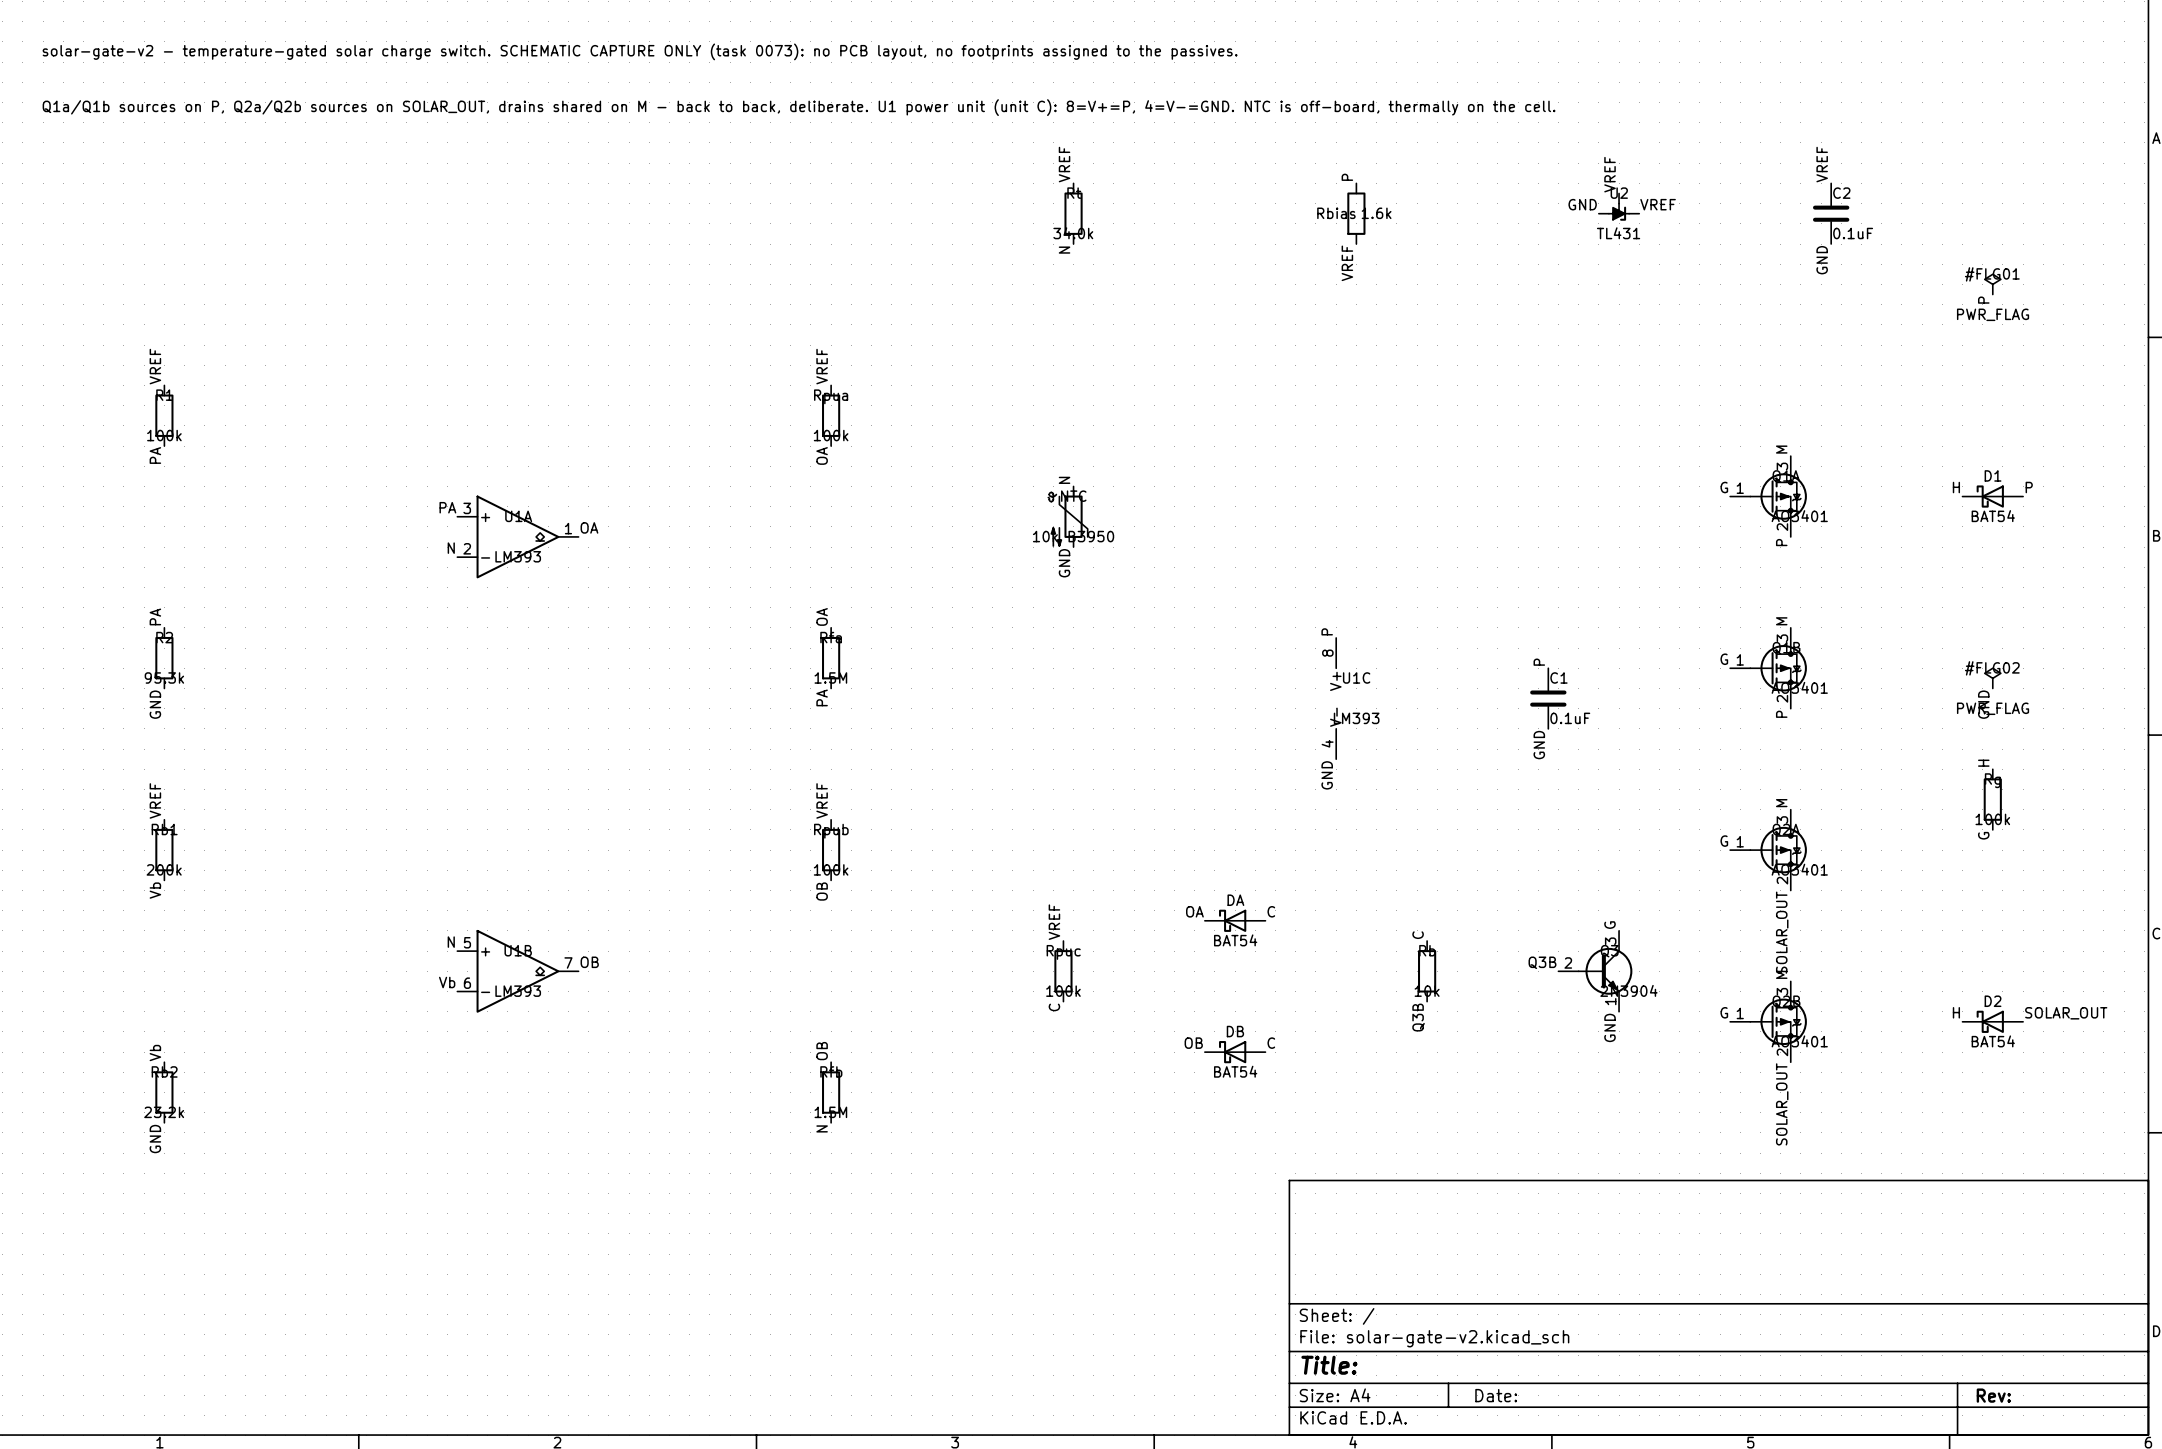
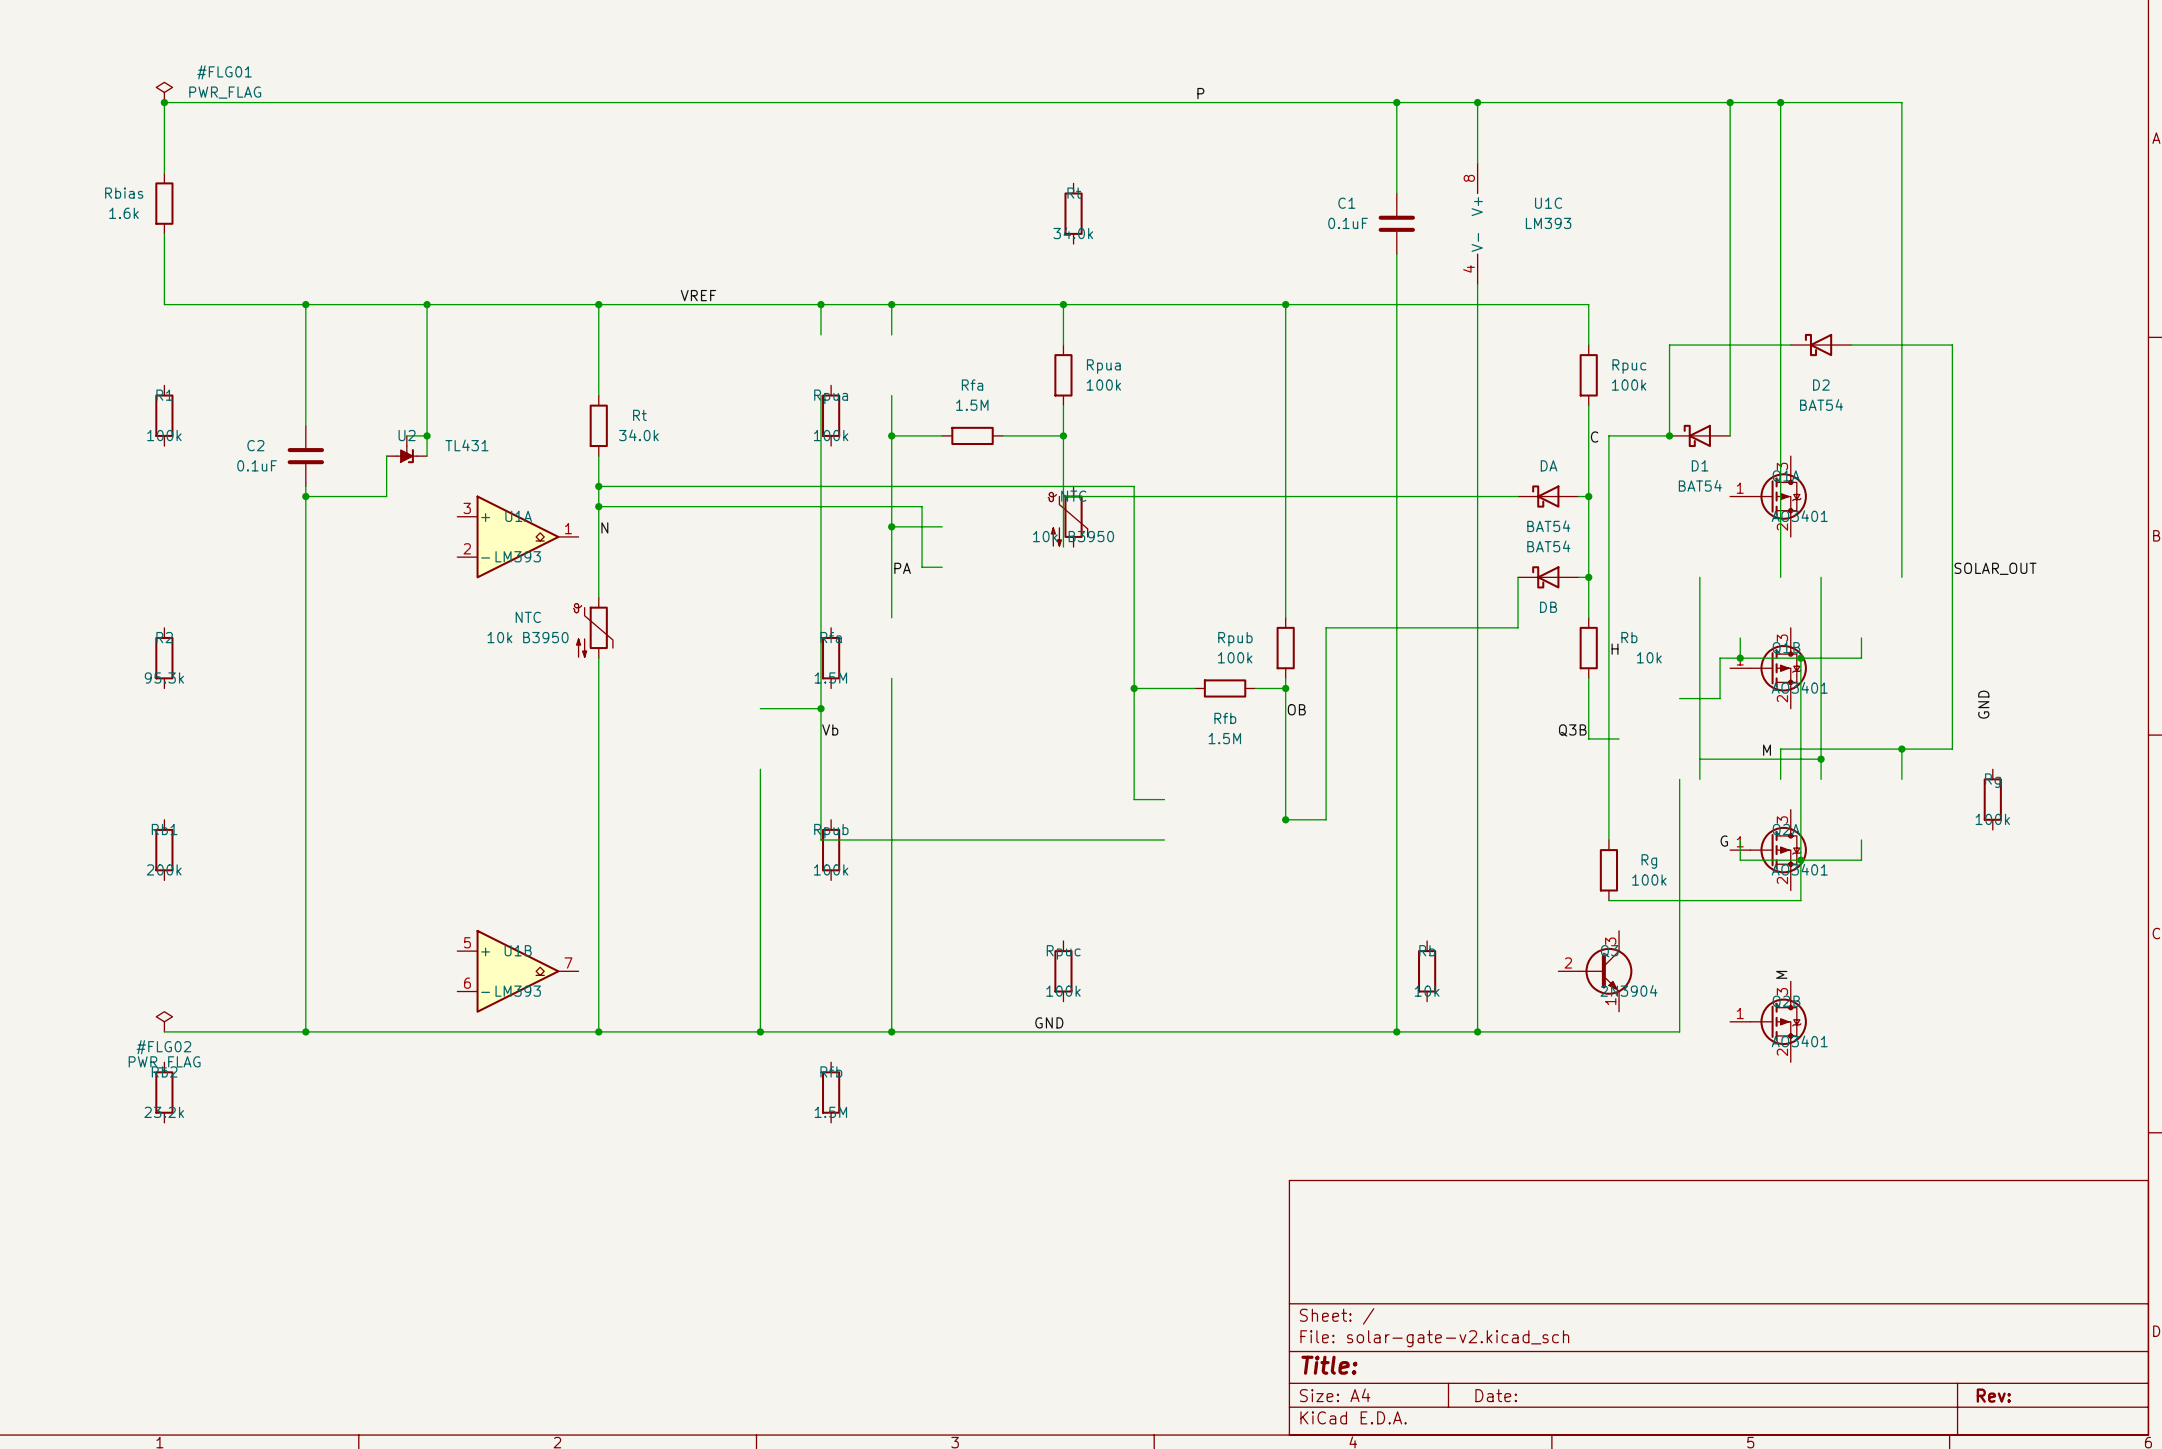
text: solar-gate-v2 - temperature-gated solar charge switch. SCHEMATIC CAPTURE ONLY (task 0073): no PCB layout, no footprints assigned to the passives. (640, 51) -> none
junction: none -> (164, 102)
wire: none -> (1396, 102) (1396, 193)
junction: none -> (1396, 102)
wire: none -> (1477, 102) (1477, 163)
junction: none -> (1477, 102)
wire: none -> (1730, 102) (1730, 435)
junction: none -> (1730, 102)
wire: none -> (1780, 102) (1780, 577)
junction: none -> (1780, 102)
text: Q1a/Q1b sources on P, Q2a/Q2b sources on SOLAR_OUT, drains shared on M - back to back, deliberate. U1 power unit (unit C): 8=V+=P, 4=V-=GND. NTC is off-board, thermally on the cell. (799, 107) -> none
label: VREF (1064, 164) -> none
label: VREF (1822, 164) -> none
wire: none -> (164, 173) (164, 102) (1901, 102) (1901, 577)
label: VREF (1610, 174) -> none
label rotation: 0° (1347, 177) -> 90° clockwise (1200, 93)
label position: P (1347, 177) -> P (1200, 93)
C2 name position: C2 (1841, 193) -> C2 (255, 445)
Rbias: none -> 1.6k (164, 203)
label: GND (1582, 204) -> none
label: VREF (1658, 204) -> none
U2 position: (1619, 207) -> (406, 449)
Rbias: 1.6k (1356, 213) -> none
C2 position: (1831, 213) -> (305, 456)
wire: none -> (164, 233) (164, 304) (1588, 304) (1588, 345)
U2 value position: TL431 (1618, 233) -> TL431 (466, 445)
C2 value position: 0.1uF (1853, 233) -> 0.1uF (257, 465)
label: N (1064, 250) -> none
wire: none -> (1396, 254) (1396, 1031)
label: GND (1822, 260) -> none
label: VREF (1347, 263) -> none
#FLG01 name position: #FLG01 (1992, 274) -> #FLG01 (224, 72)
wire: none -> (1477, 284) (1477, 1031)
#FLG01 position: PWR_FLAG (1992, 284) -> PWR_FLAG (164, 92)
label: P (1983, 300) -> none
wire: none -> (305, 304) (305, 425)
junction: none -> (305, 304)
wire: none -> (427, 304) (427, 456)
junction: none -> (427, 304)
wire: none -> (598, 304) (598, 395)
junction: none -> (598, 304)
wire: none -> (821, 304) (821, 334)
junction: none -> (821, 304)
wire: none -> (891, 304) (891, 334)
junction: none -> (891, 304)
wire: none -> (1063, 304) (1063, 345)
junction: none -> (1063, 304)
wire: none -> (1285, 304) (1285, 617)
junction: none -> (1285, 304)
#FLG01 text position: PWR_FLAG (1993, 314) -> PWR_FLAG (225, 92)
wire: none -> (1790, 345) (1669, 345) (1669, 435) (1608, 435) (1608, 839)
wire: none -> (1851, 345) (1952, 345) (1952, 749) (1780, 749) (1780, 779)
label: VREF (155, 366) -> none
label rotation: 0° (822, 366) -> 90° clockwise (698, 295)
label position: VREF (822, 366) -> VREF (698, 295)
Rpua: none -> 100k (1063, 375)
Rpuc: none -> 100k (1588, 375)
wire: none -> (821, 395) (821, 839) (1164, 839)
wire: none -> (891, 395) (891, 617)
wire: none -> (1063, 405) (1063, 547)
wire: none -> (1588, 405) (1588, 617)
Rt: none -> 34.0k (598, 425)
wire: none -> (406, 435) (427, 435)
junction: none -> (427, 435)
wire: none -> (891, 435) (942, 435)
junction: none -> (891, 435)
Rfa: none -> 1.5M (972, 435)
wire: none -> (1002, 435) (1063, 435)
junction: none -> (1063, 435)
junction: none -> (1669, 435)
label: none -> C (1594, 437)
label: M (1781, 449) -> none
label: PA (155, 455) -> none
label: OA (822, 455) -> none
wire: none -> (386, 456) (386, 496) (305, 496)
wire: none -> (598, 456) (598, 597)
D1 name position: D1 (1993, 475) -> D1 (1700, 465)
label: N (1064, 480) -> none
wire: none -> (305, 486) (305, 1031)
wire: none -> (598, 486) (1134, 486) (1134, 799) (1164, 799)
junction: none -> (598, 486)
label: G (1724, 487) -> none
label: H (1956, 487) -> none
label: P (2029, 487) -> none
junction: none -> (305, 496)
wire: none -> (1063, 496) (1518, 496)
DA: none -> BAT54 (1548, 496)
wire: none -> (1578, 496) (1588, 496)
junction: none -> (1588, 496)
D1 position: (1992, 496) -> (1699, 435)
wire: none -> (598, 506) (922, 506) (922, 567) (942, 567)
junction: none -> (598, 506)
label: PA (447, 507) -> none
D1 value position: BAT54 (1993, 516) -> BAT54 (1700, 485)
wire: none -> (891, 526) (942, 526)
junction: none -> (891, 526)
label: OA (589, 527) -> none
label: P (1781, 542) -> none
label position: N (451, 548) -> N (604, 527)
label: GND (1064, 563) -> none
label: none -> SOLAR_OUT (1995, 568)
wire: none -> (1518, 577) (1518, 627) (1326, 627) (1326, 819) (1285, 819) (1285, 678)
DB: none -> BAT54 (1548, 577)
wire: none -> (1578, 577) (1588, 577)
junction: none -> (1588, 577)
wire: none -> (1699, 577) (1699, 779)
wire: none -> (1821, 577) (1821, 779)
label: PA (155, 616) -> none
label: OA (822, 616) -> none
label: M (1781, 621) -> none
NTC: none -> 10k B3950 (593, 627)
label: P (1327, 631) -> none
wire: none -> (1740, 637) (1740, 658)
wire: none -> (1861, 637) (1861, 658) (1720, 658) (1720, 698) (1679, 698)
Rpub: none -> 100k (1285, 648)
Rb: none -> 10k (1588, 648)
label: none -> H (1615, 649)
wire: none -> (598, 658) (598, 1031)
junction: none -> (1740, 658)
wire: none -> (1800, 658) (1800, 900) (1608, 900)
junction: none -> (1800, 658)
label: G (1724, 659) -> none
label: P (1539, 662) -> none
#FLG02 name position: #FLG02 (1992, 668) -> #FLG02 (163, 1047)
U1C name position: U1C (1356, 677) -> U1C (1548, 203)
C1 name position: C1 (1558, 677) -> C1 (1346, 203)
wire: none -> (891, 678) (891, 1031)
wire: none -> (1588, 678) (1588, 738) (1619, 738)
#FLG02 position: PWR_FLAG (1992, 678) -> PWR_FLAG (164, 1021)
wire: none -> (1134, 688) (1194, 688)
junction: none -> (1134, 688)
Rfb: none -> 1.5M (1225, 688)
wire: none -> (1255, 688) (1285, 688)
junction: none -> (1285, 688)
label rotation: 0° (822, 697) -> 90° clockwise (902, 568)
label position: PA (822, 697) -> PA (902, 568)
U1C position: (1336, 698) -> (1477, 223)
C1 position: (1548, 698) -> (1396, 223)
label: GND (155, 704) -> none
wire: none -> (760, 708) (821, 708)
junction: none -> (821, 708)
#FLG02 text position: PWR_FLAG (1993, 708) -> PWR_FLAG (164, 1062)
label: none -> OB (1296, 709)
label: P (1781, 714) -> none
U1C value position: LM393 (1356, 718) -> LM393 (1548, 223)
C1 value position: 0.1uF (1570, 718) -> 0.1uF (1348, 223)
label: none -> Vb (830, 729)
label: none -> Q3B (1572, 730)
label: GND (1539, 745) -> none
wire: none -> (1901, 749) (1901, 779)
junction: none -> (1901, 749)
wire: none -> (1699, 759) (1821, 759)
junction: none -> (1821, 759)
label: H (1983, 763) -> none
wire: none -> (760, 769) (760, 1031)
label: GND (1327, 775) -> none
wire: none -> (1679, 779) (1679, 1031) (164, 1031)
label: VREF (155, 800) -> none
label: VREF (822, 800) -> none
label rotation: 0° (1781, 803) -> 90° clockwise (1767, 750)
label position: M (1781, 803) -> M (1767, 750)
junction: none -> (1285, 819)
label: G (1983, 835) -> none
wire: none -> (1740, 839) (1740, 860) (1861, 860) (1861, 839)
junction: none -> (1800, 860)
Rg: none -> 100k (1608, 870)
label: Vb (155, 890) -> none
label: OB (822, 891) -> none
label: OA (1194, 911) -> none
label: C (1271, 911) -> none
DA: BAT54 (1235, 920) -> none
label: VREF (1054, 922) -> none
label: G (1610, 925) -> none
label: SOLAR_OUT (1782, 932) -> none
label: C (1418, 935) -> none
label: N (451, 942) -> none
label: OB (589, 962) -> none
label: Q3B (1542, 962) -> none
label: Vb (447, 982) -> none
D2 name position: D2 (1993, 1001) -> D2 (1821, 385)
label: C (1054, 1007) -> none
label: G (1724, 1012) -> none
label: H (1956, 1012) -> none
label: SOLAR_OUT (2066, 1013) -> none
label: Q3B (1418, 1017) -> none
D2 position: (1992, 1021) -> (1821, 345)
label: none -> GND (1049, 1022)
label: GND (1610, 1027) -> none
junction: none -> (305, 1031)
junction: none -> (598, 1031)
junction: none -> (760, 1031)
junction: none -> (891, 1031)
junction: none -> (1396, 1031)
junction: none -> (1477, 1031)
D2 value position: BAT54 (1993, 1041) -> BAT54 (1821, 405)
label: OB (1193, 1043) -> none
label: C (1271, 1043) -> none
label: OB (822, 1051) -> none
DB: BAT54 (1235, 1052) -> none
label: Vb (155, 1053) -> none
label: SOLAR_OUT (1782, 1104) -> none
label: N (822, 1128) -> none
label: GND (155, 1139) -> none

